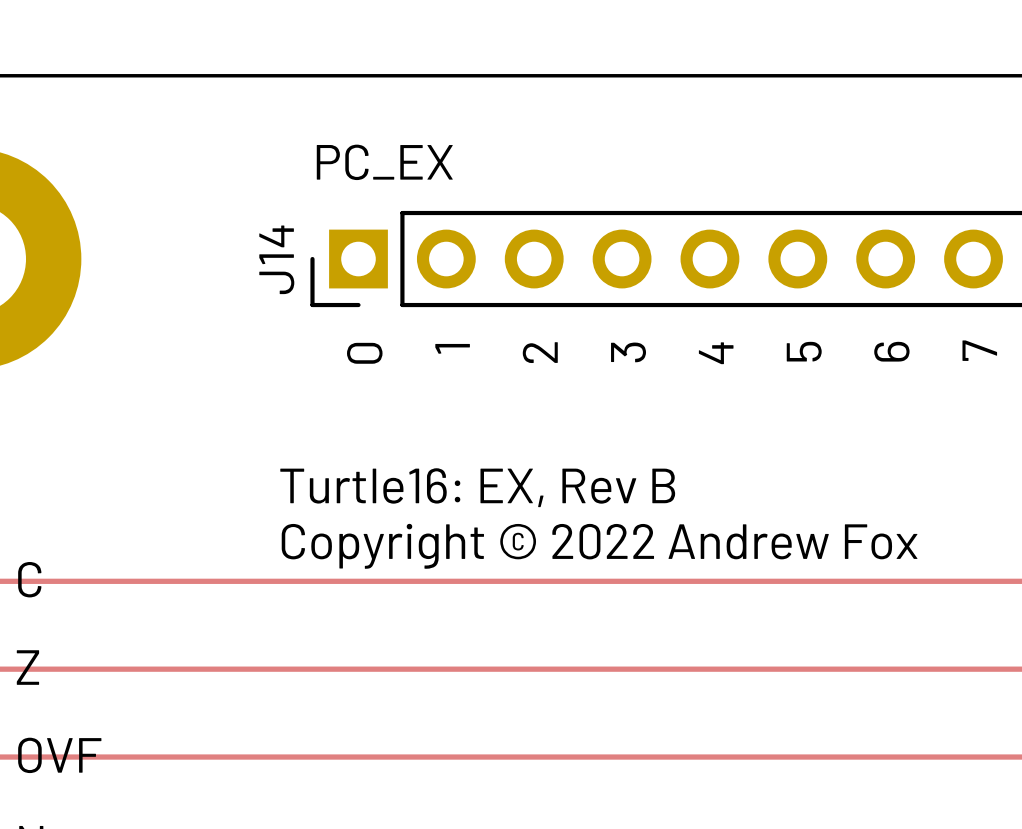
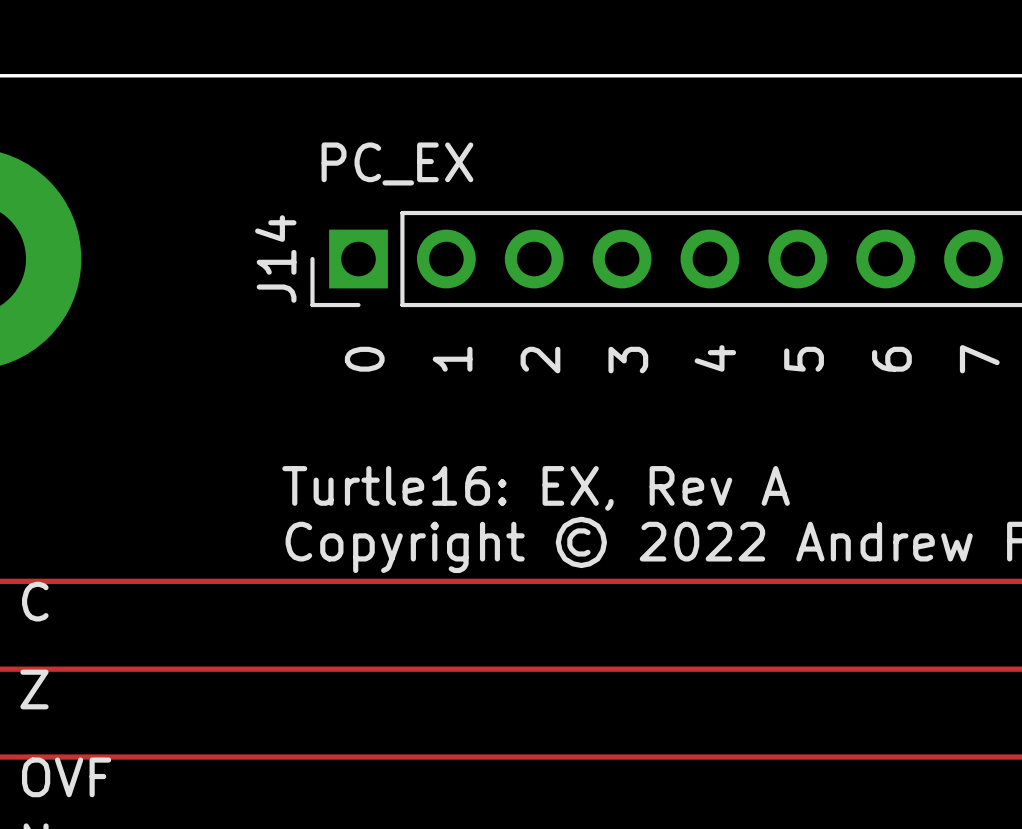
text: Turtle16: EX, Rev B (477, 487) -> Turtle16: EX, Rev A (536, 488)
text position: C (29, 579) -> C (35, 601)
text position: Z (27, 667) -> Z (34, 689)
text position: OVF (59, 755) -> OVF (66, 777)

